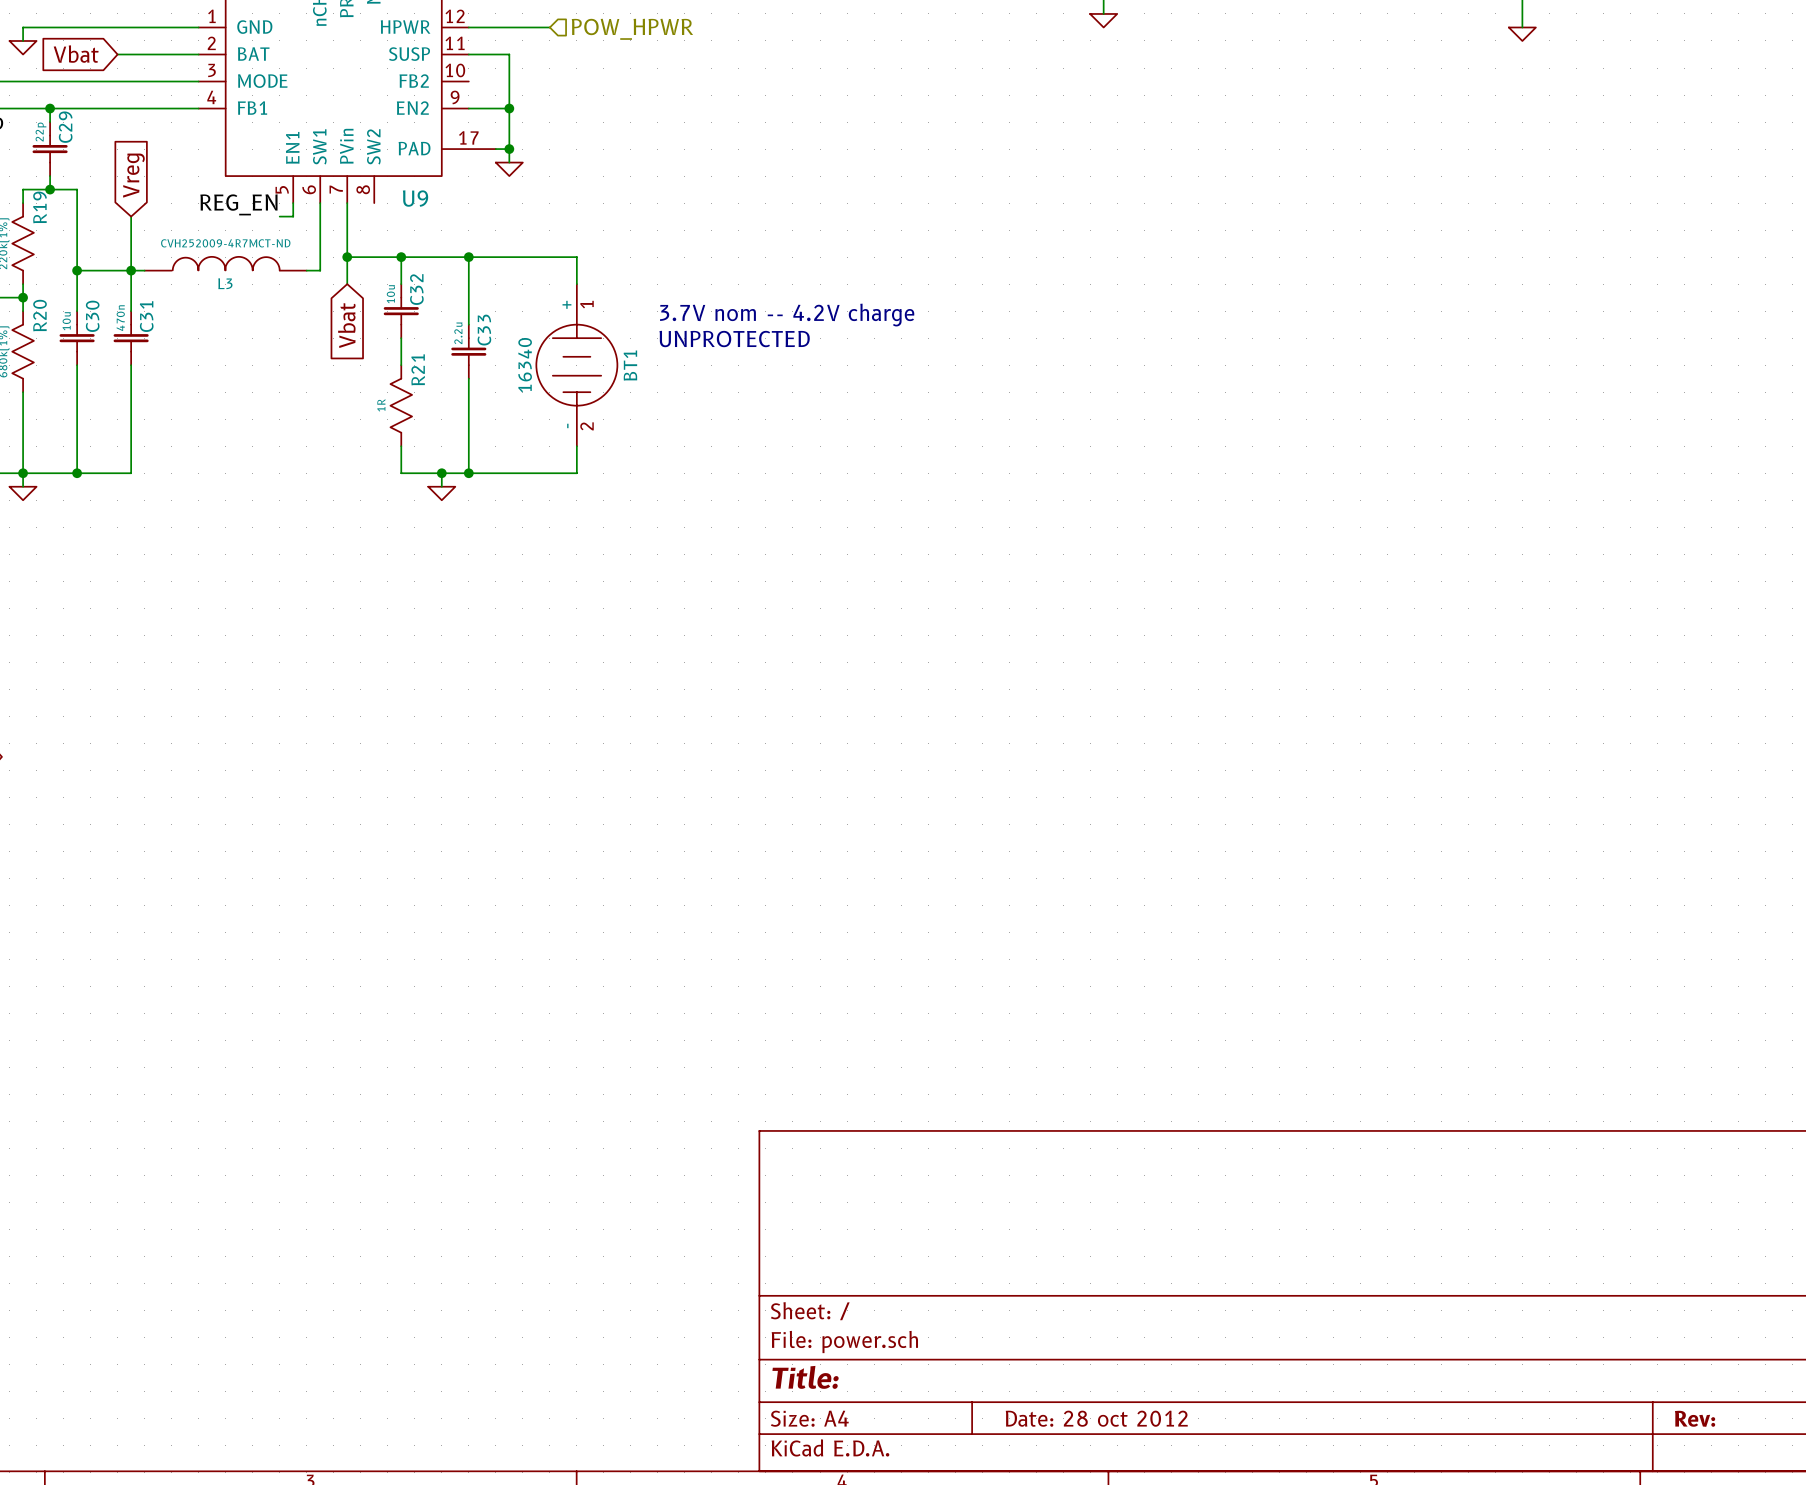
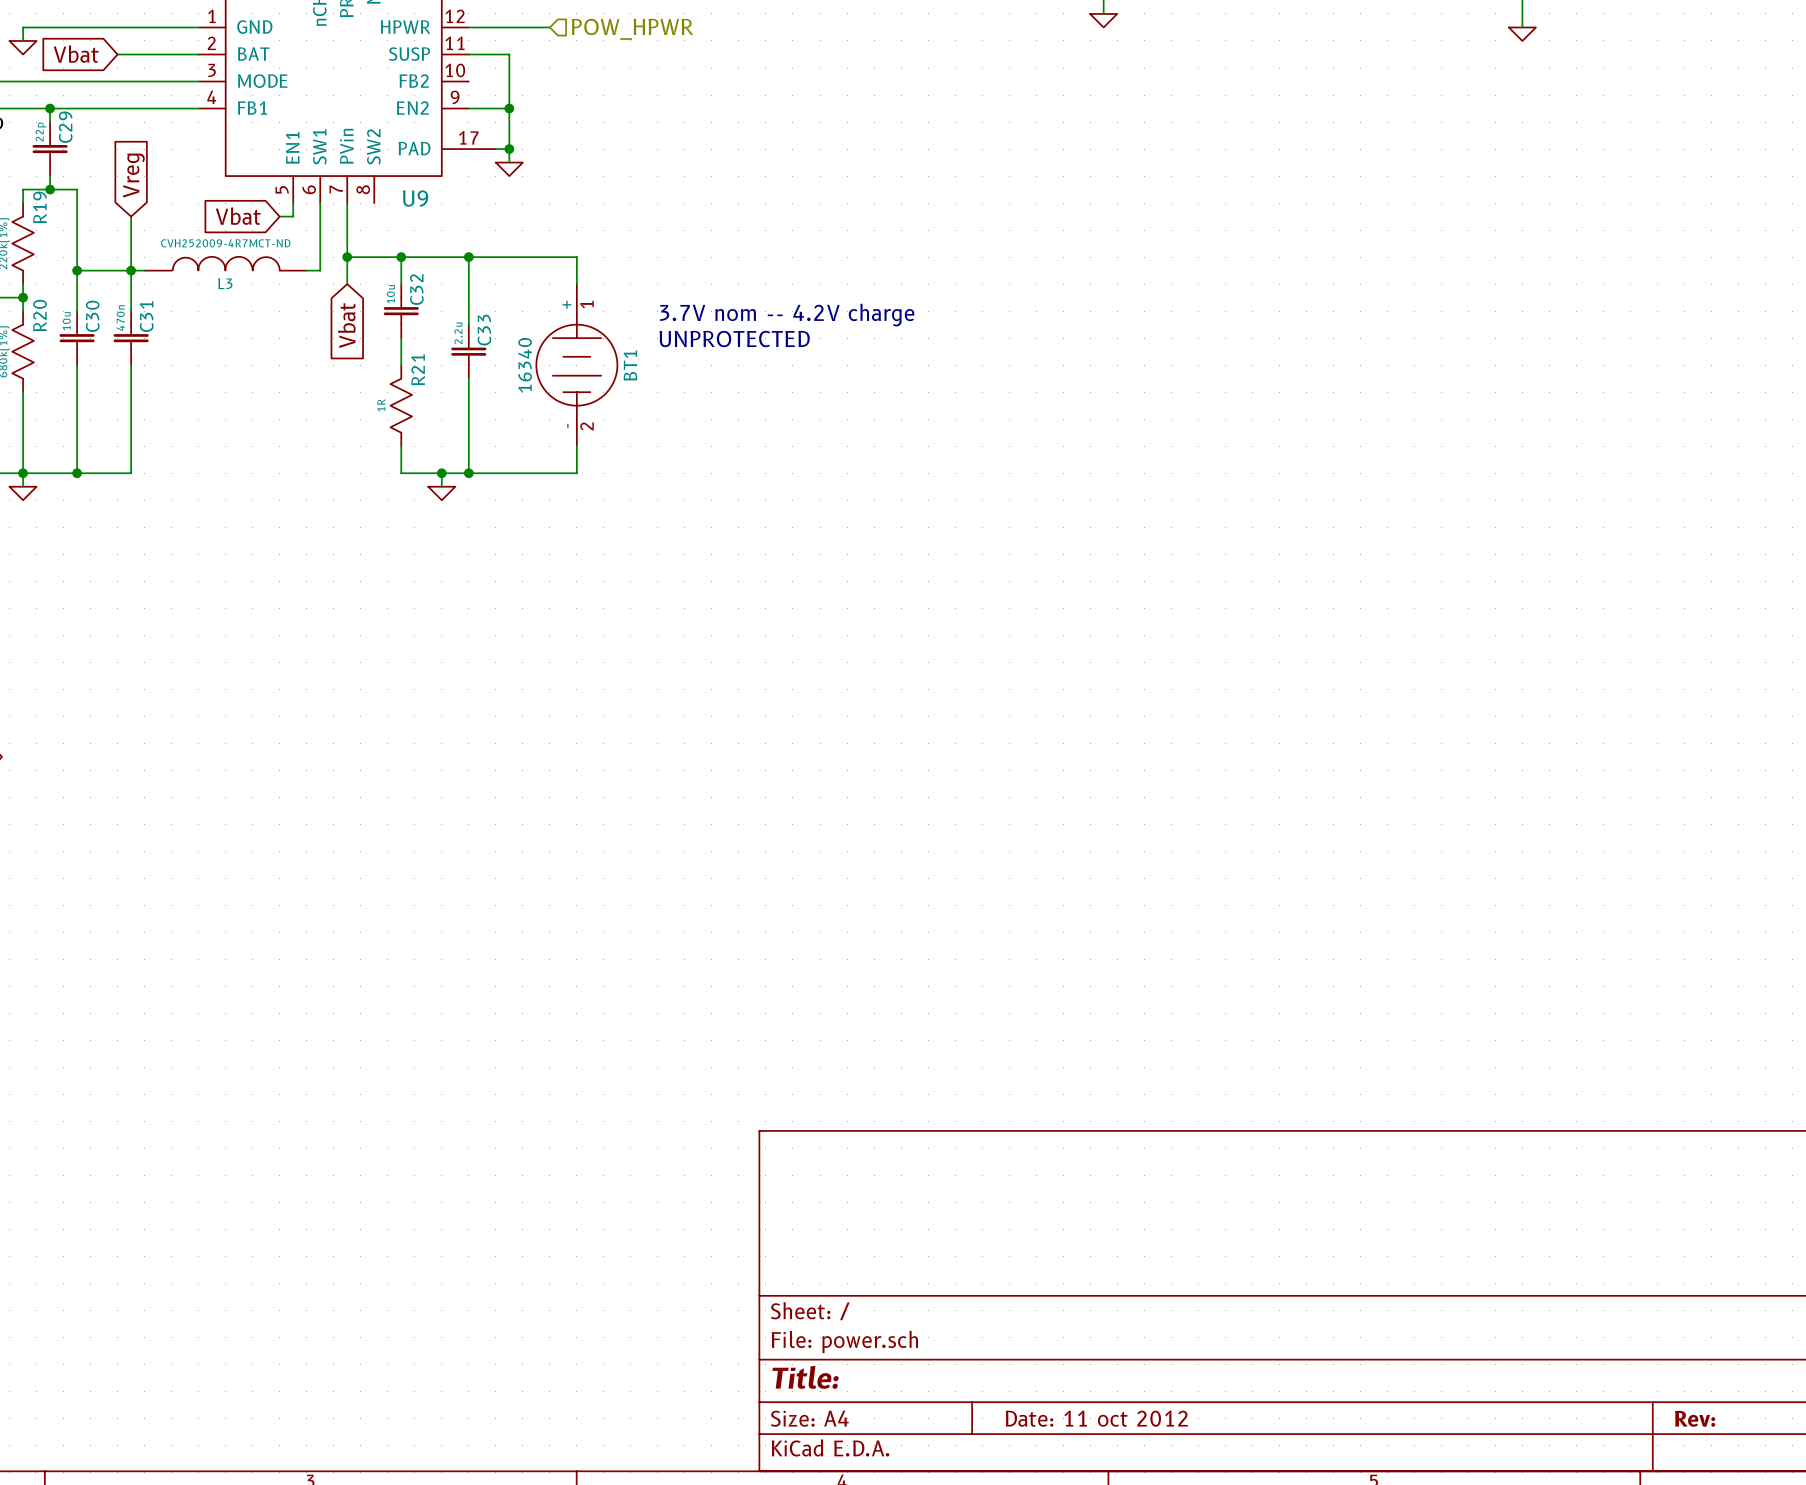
label: REG_EN (238, 204) -> none
global label: none -> Vbat (238, 216)
title block: Date: 28 oct 2012 (1096, 1418) -> Date: 11 oct 2012 (1096, 1418)

